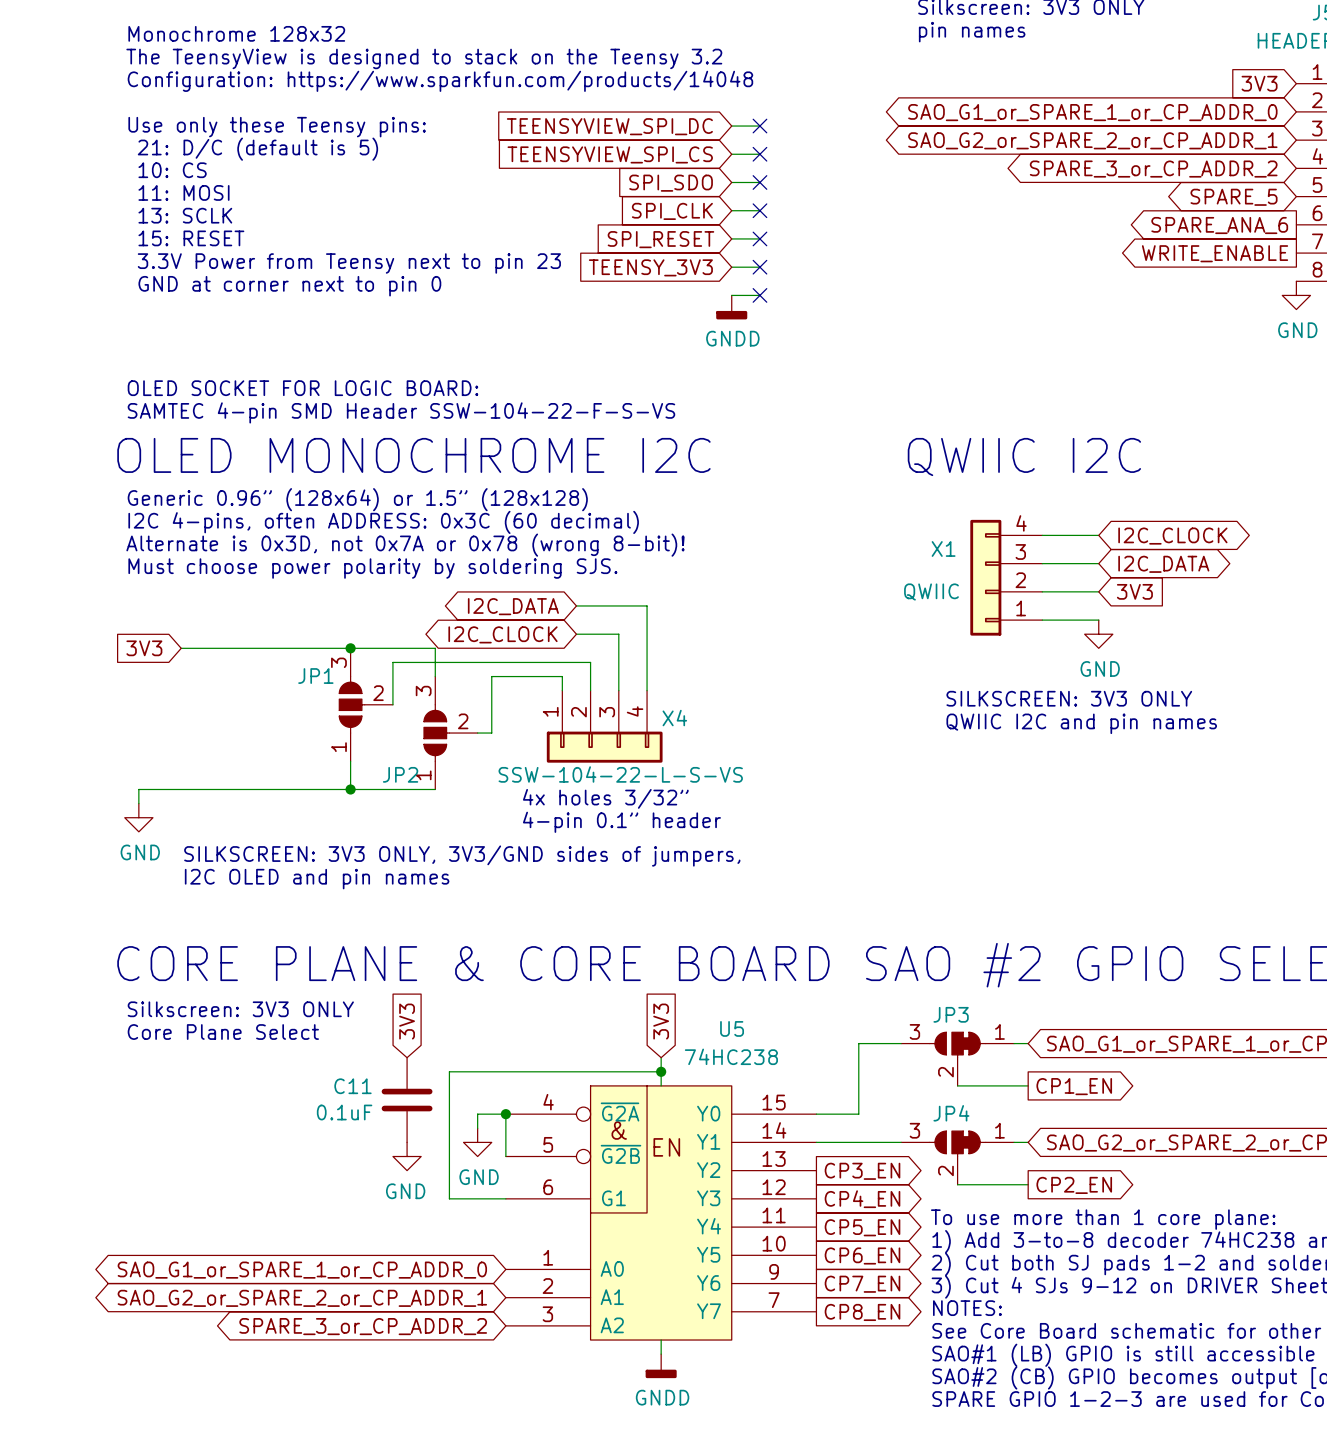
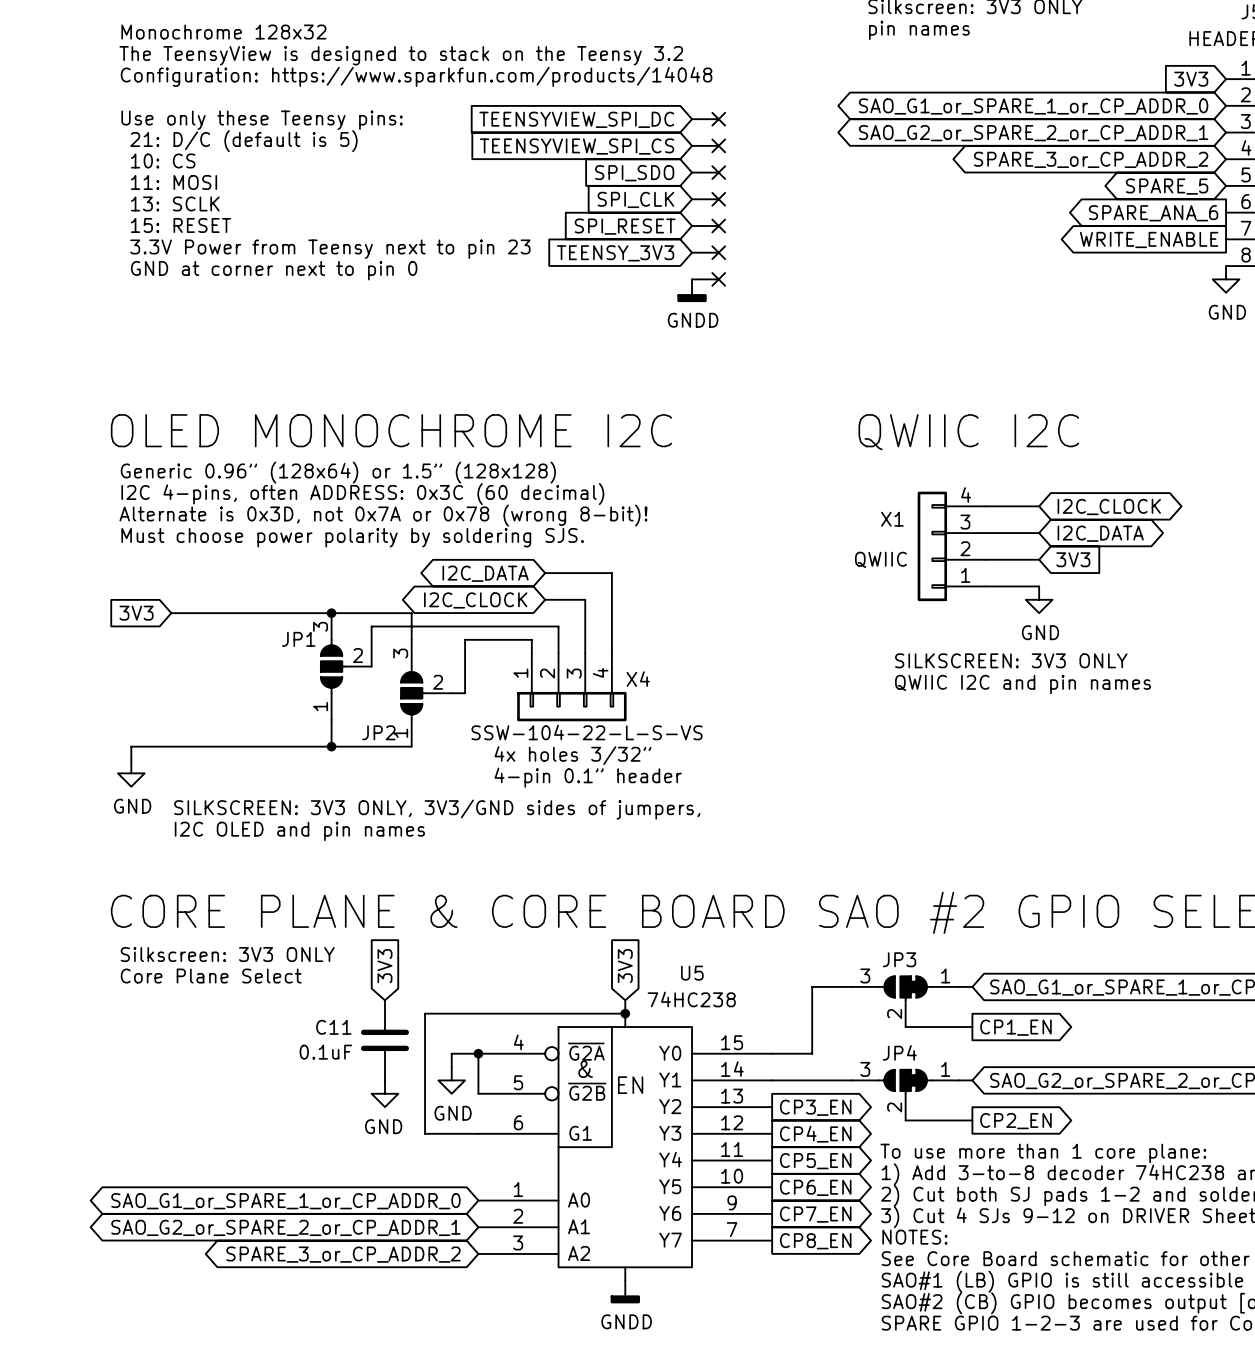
text: OLED SOCKET FOR LOGIC BOARD: (302, 388) -> none
text: SAMTEC 4-pin SMD Header SSW-104-22-F-S-VS (401, 412) -> none

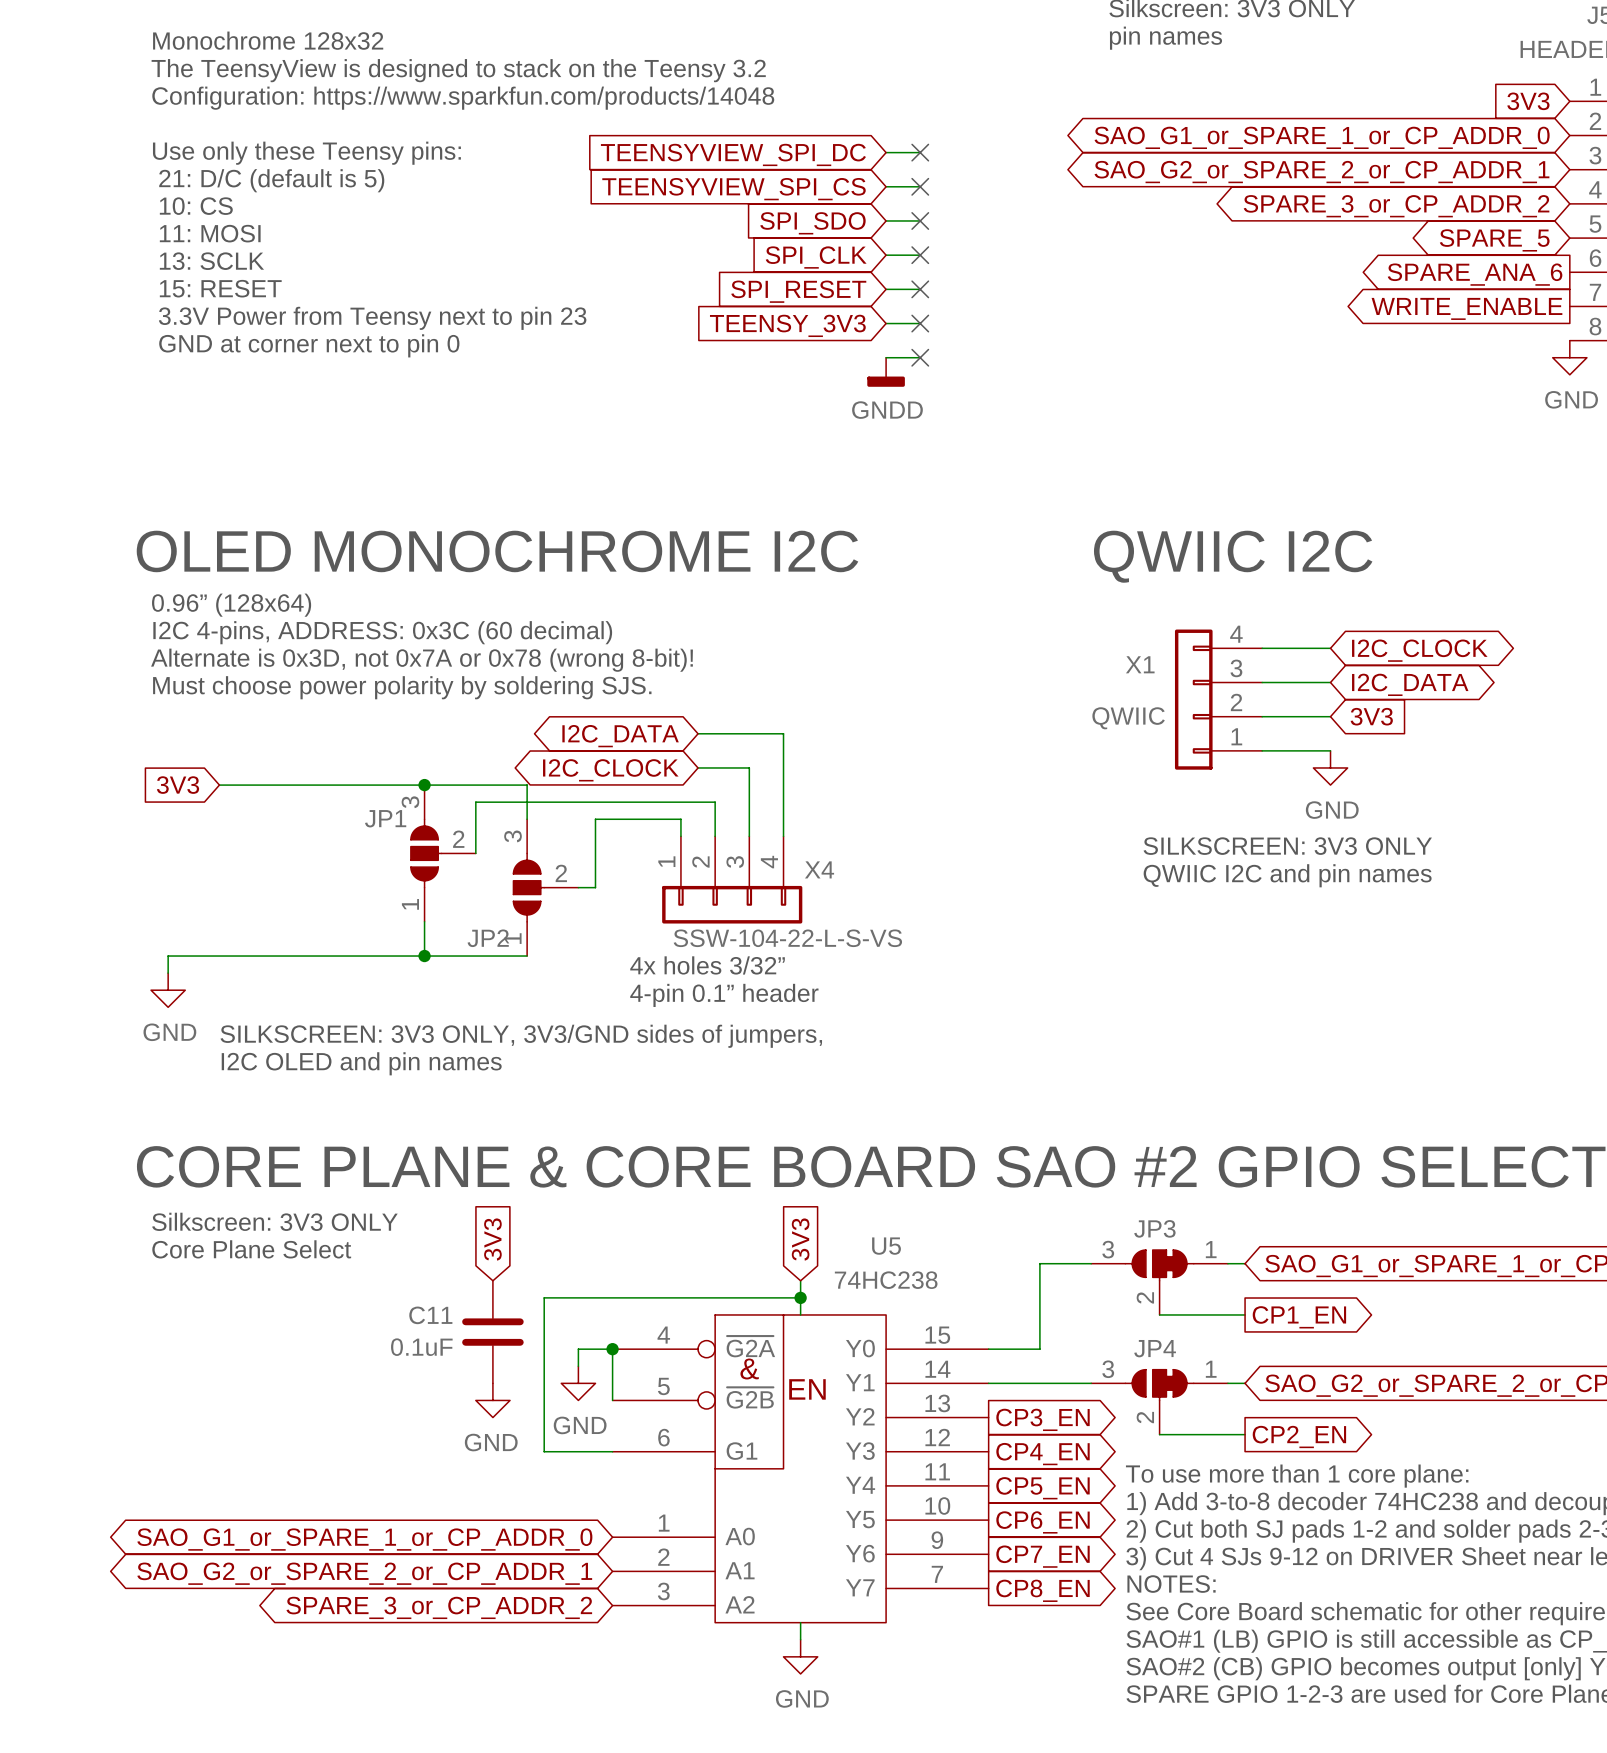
text: Generic 0.96” (128x64) or 1.5” (128x128) (338, 472) -> 0.96” (128x64) (231, 605)
text: I2C 4-pins, often ADDRESS: 0x3C (60 decimal) (362, 494) -> I2C 4-pins, ADDRESS: 0x3C (60 decimal) (382, 632)
power symbol: GNDD (625, 1292) -> GND (800, 1656)

